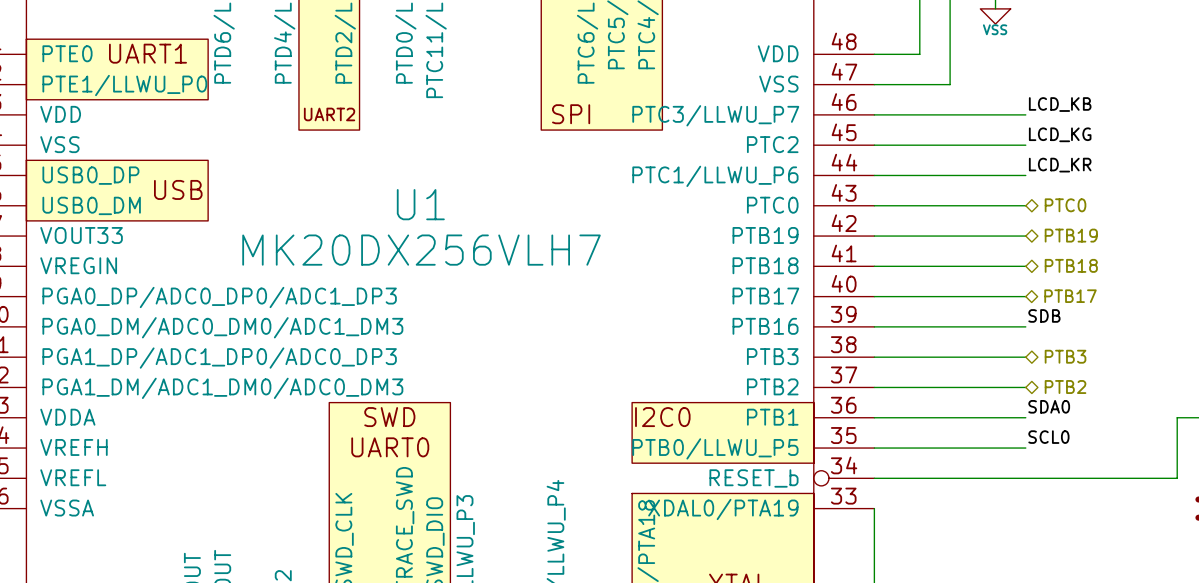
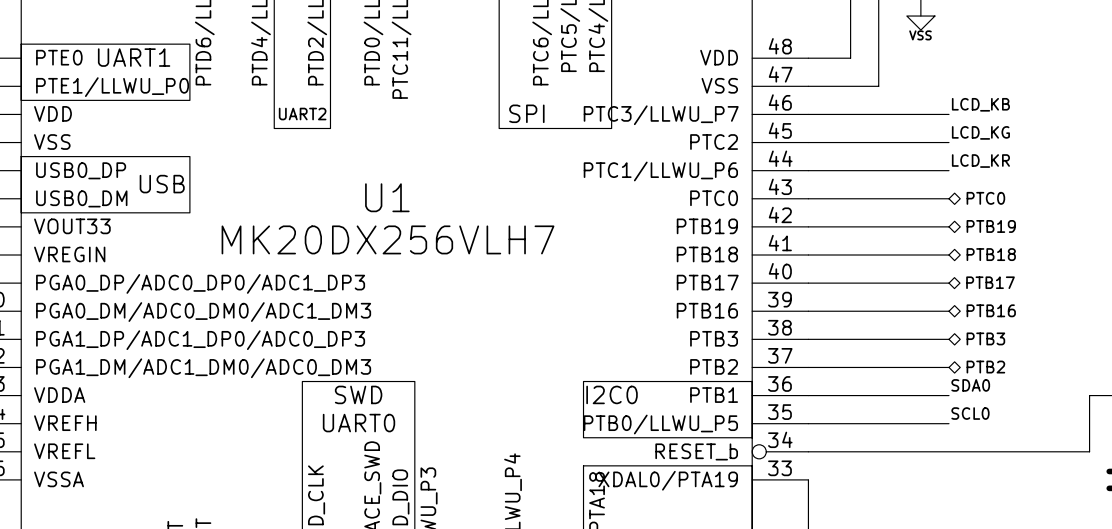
label: SDB (1044, 315) -> none
hierarchical label: none -> PTB16 (991, 310)

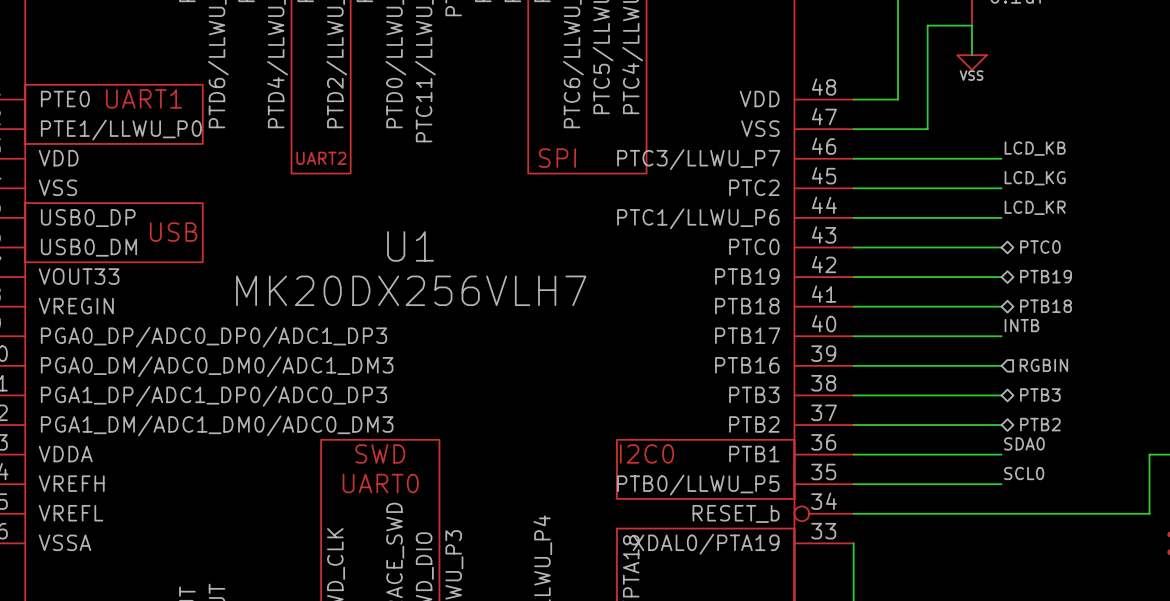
label: none -> INTB (1021, 325)
hierarchical label: PTB17 (990, 282) -> none
hierarchical label shape: bidirectional (991, 310) -> input (1043, 365)
hierarchical label: PTB16 (991, 310) -> RGBIN (1043, 365)

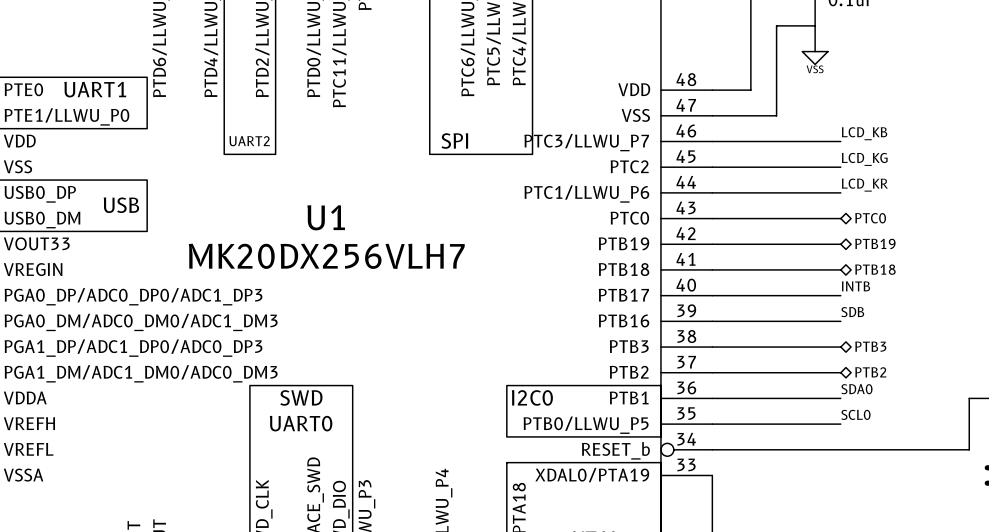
label: none -> SDB (852, 312)
hierarchical label: RGBIN (1043, 365) -> none

